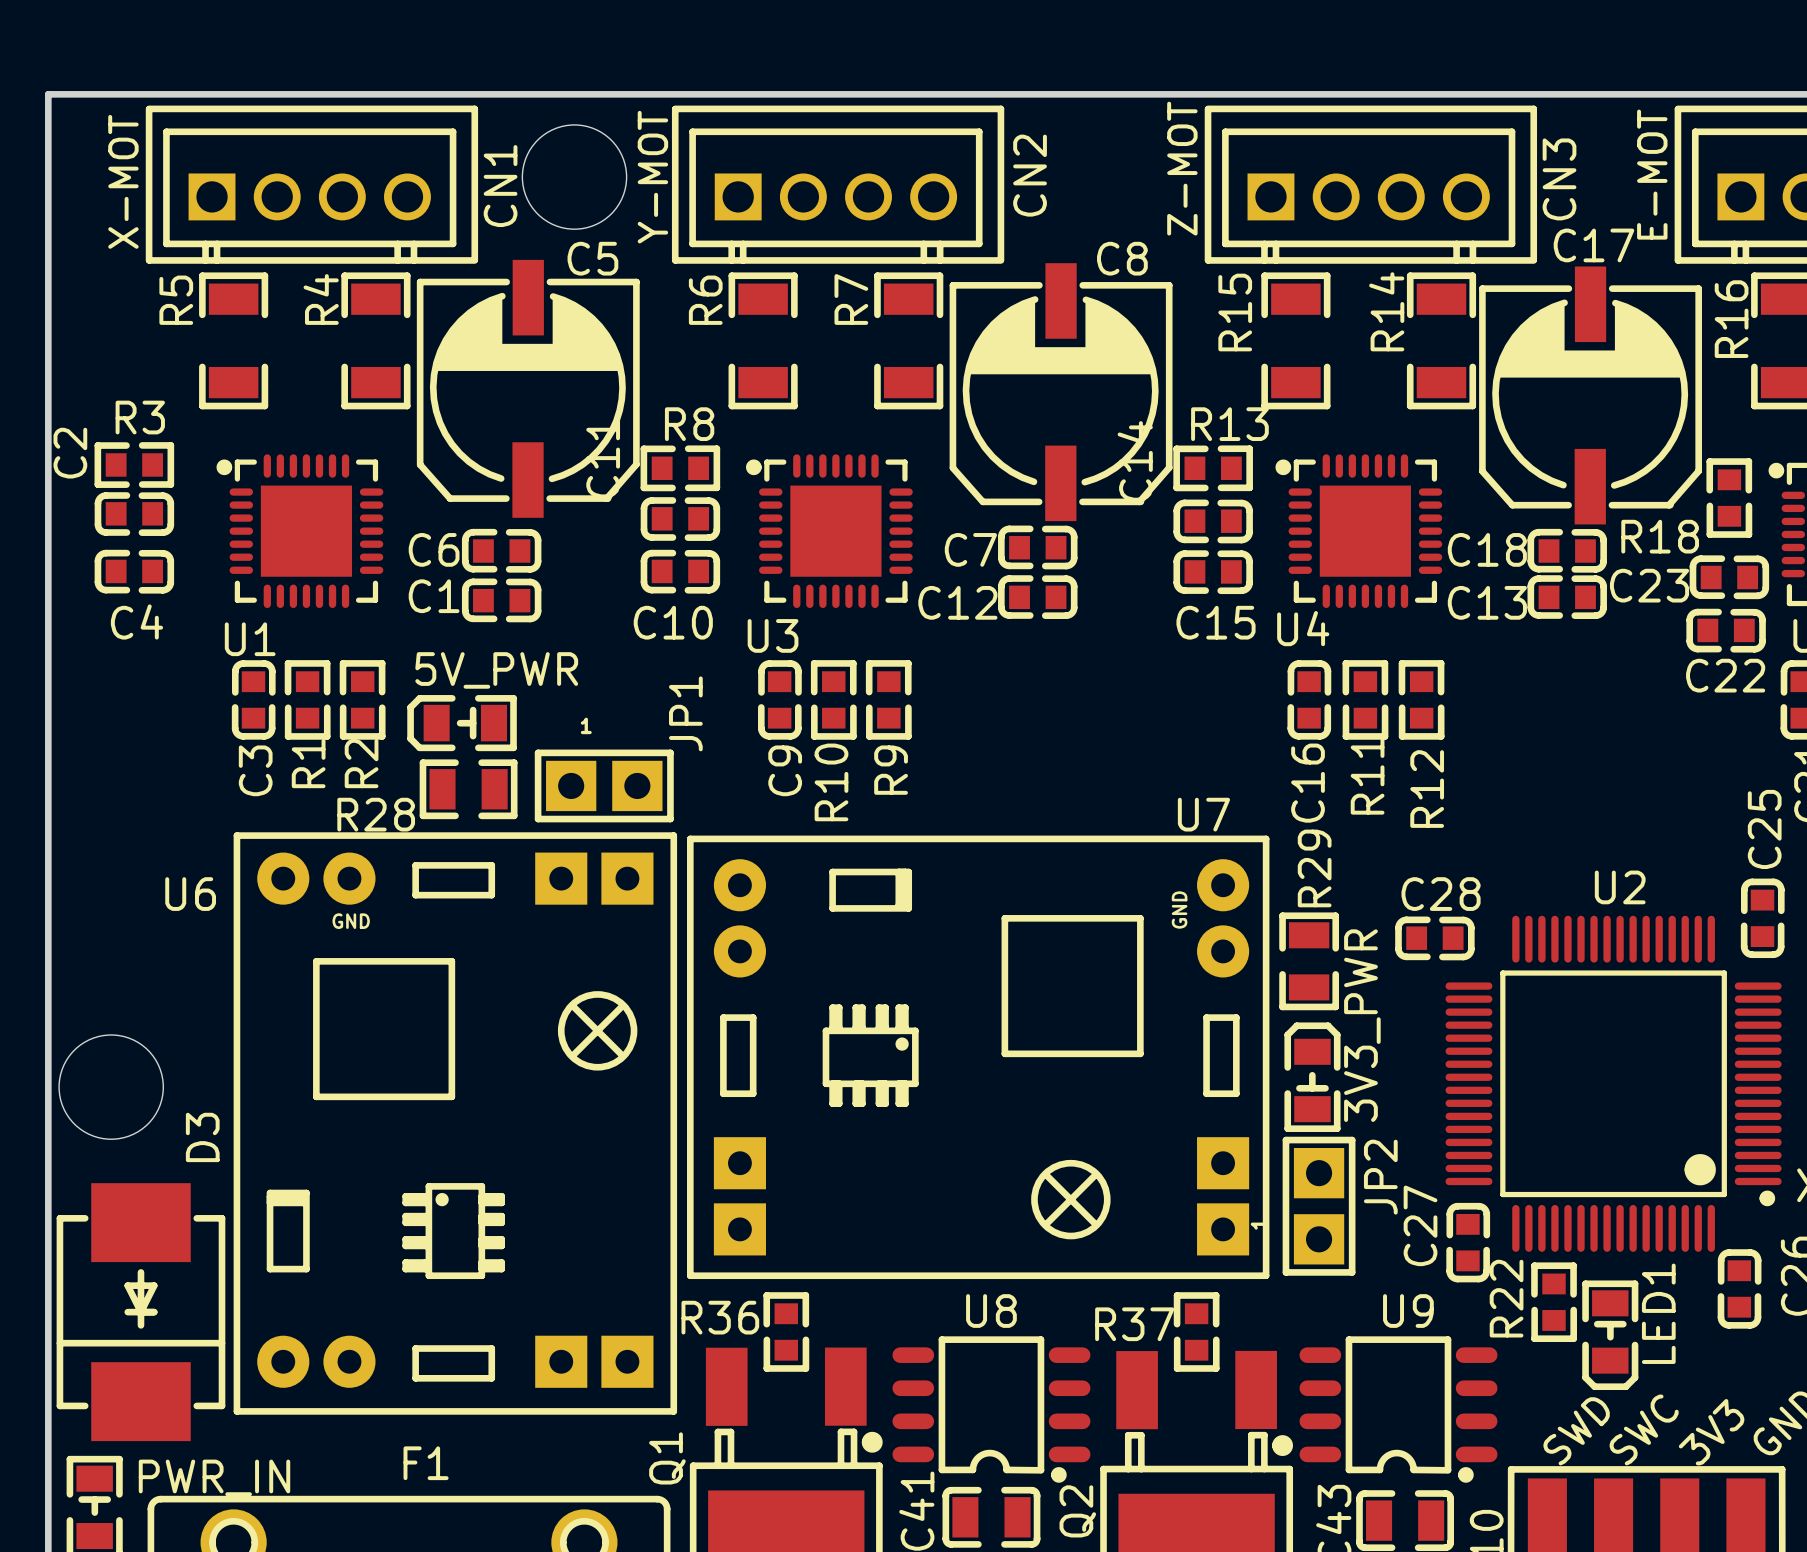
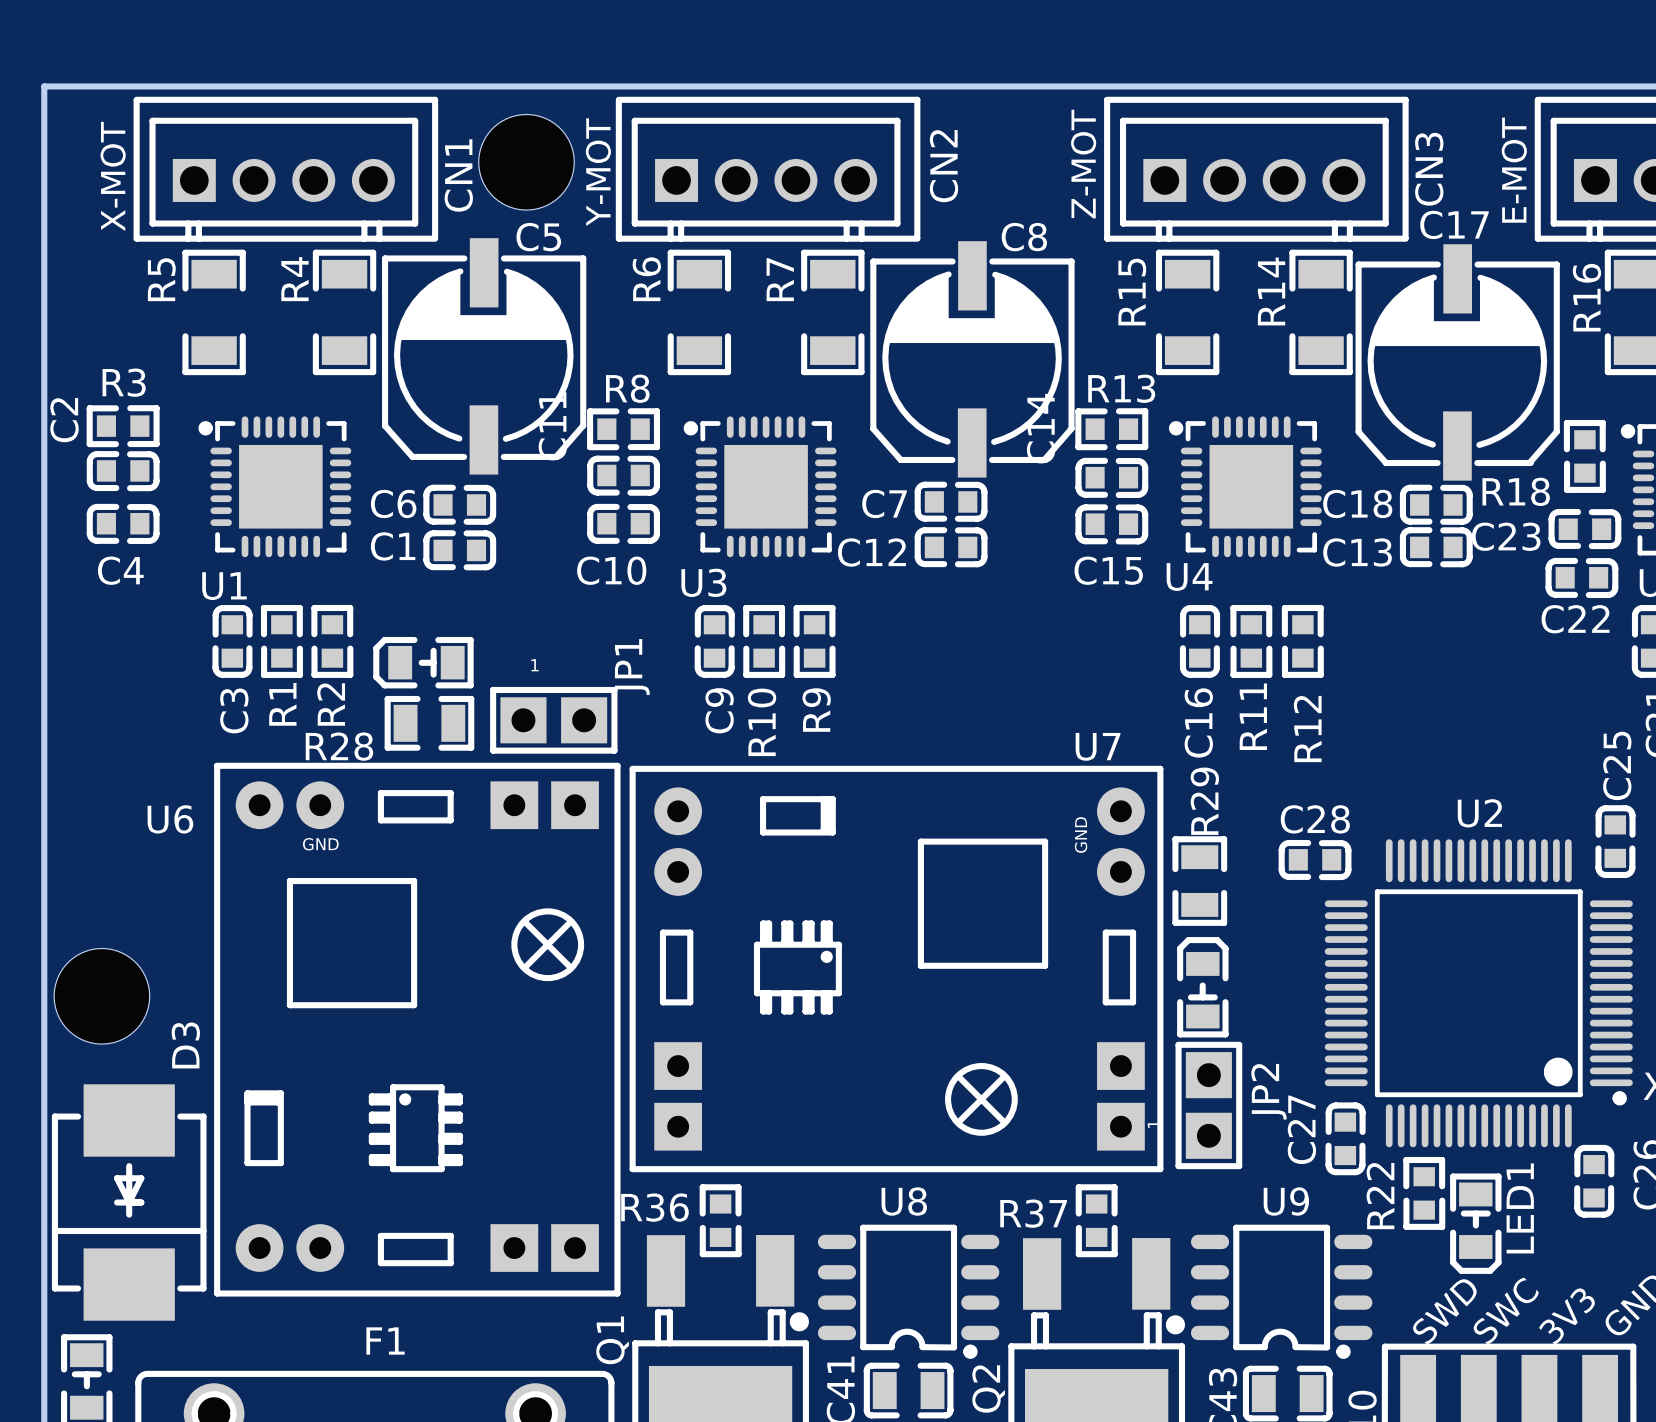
part value: 5V_PWR (496, 670) -> none
part value: 3V3_PWR (1362, 1025) -> none
part value: PWR_IN (214, 1477) -> none

